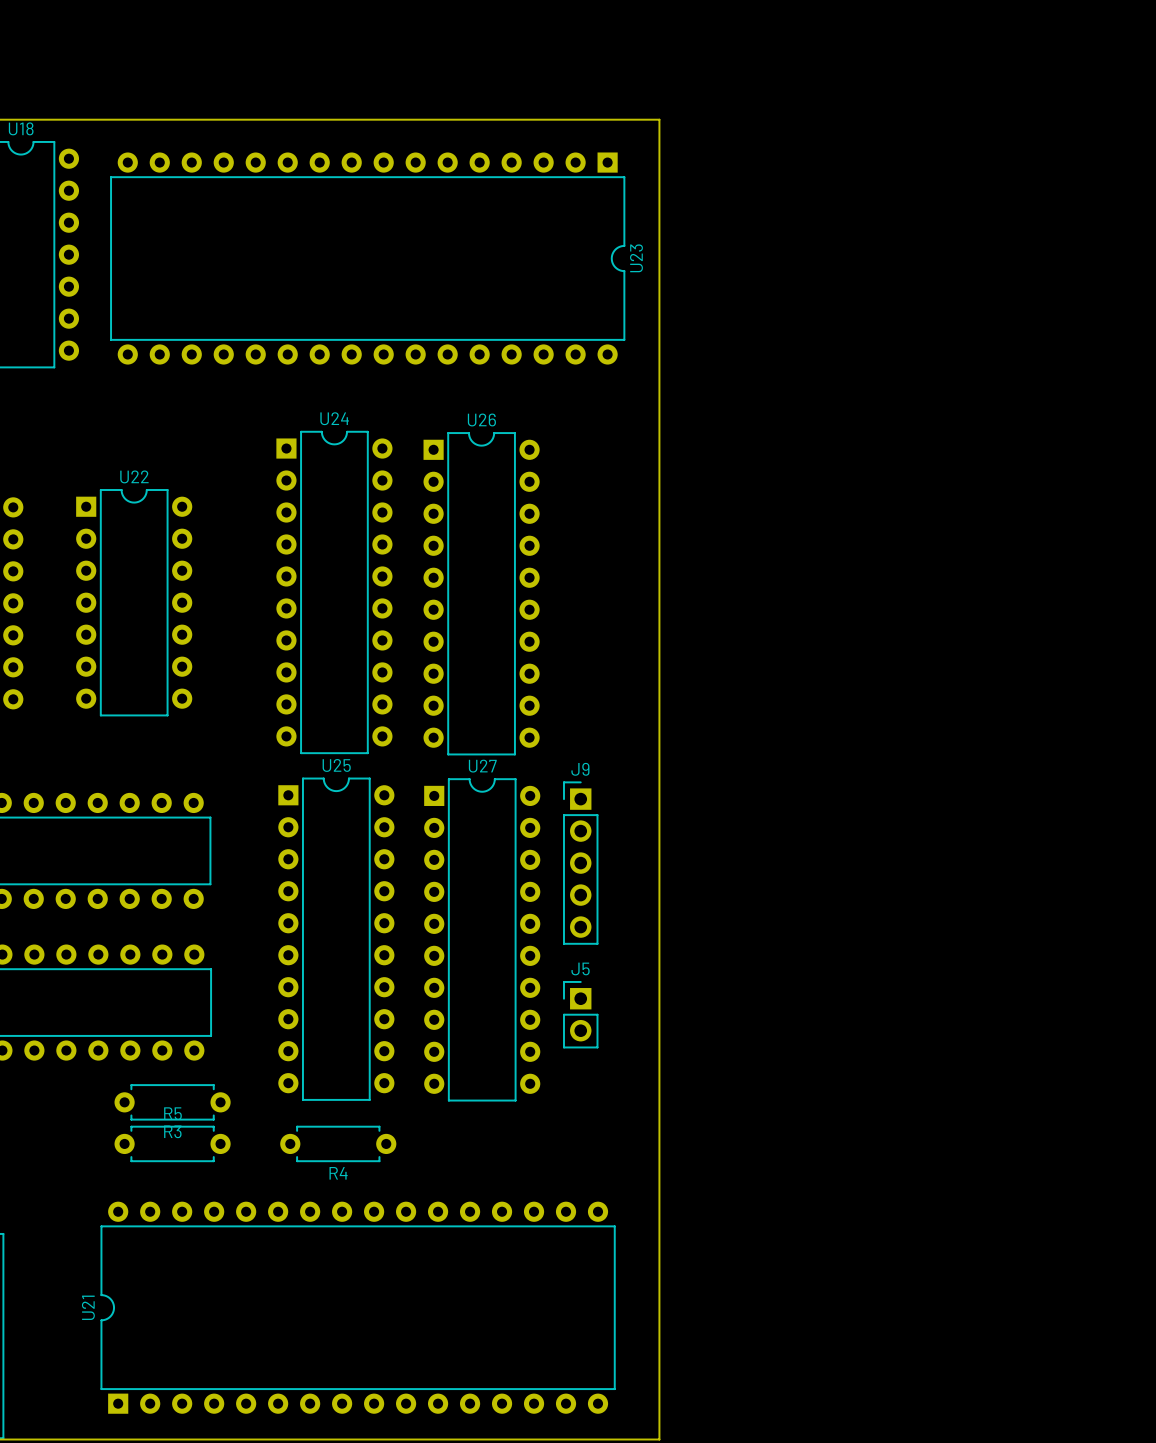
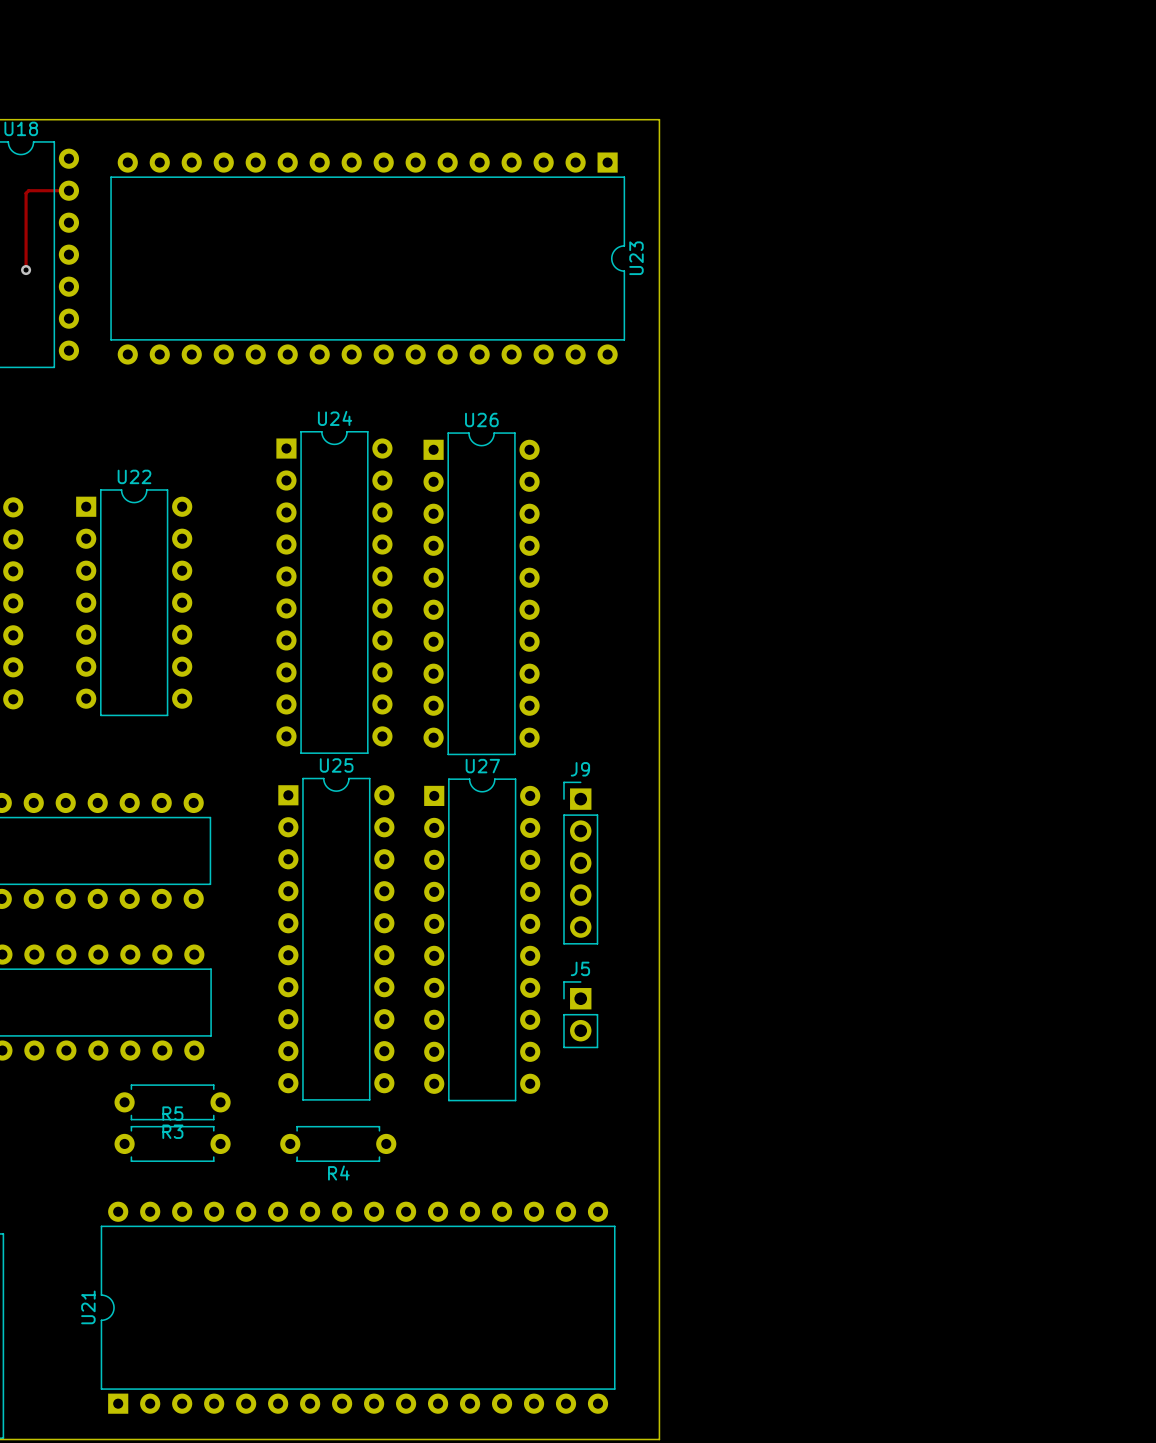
track: none -> (68, 190) (28, 190) (26, 193) (26, 270)
via: none -> (26, 270)

